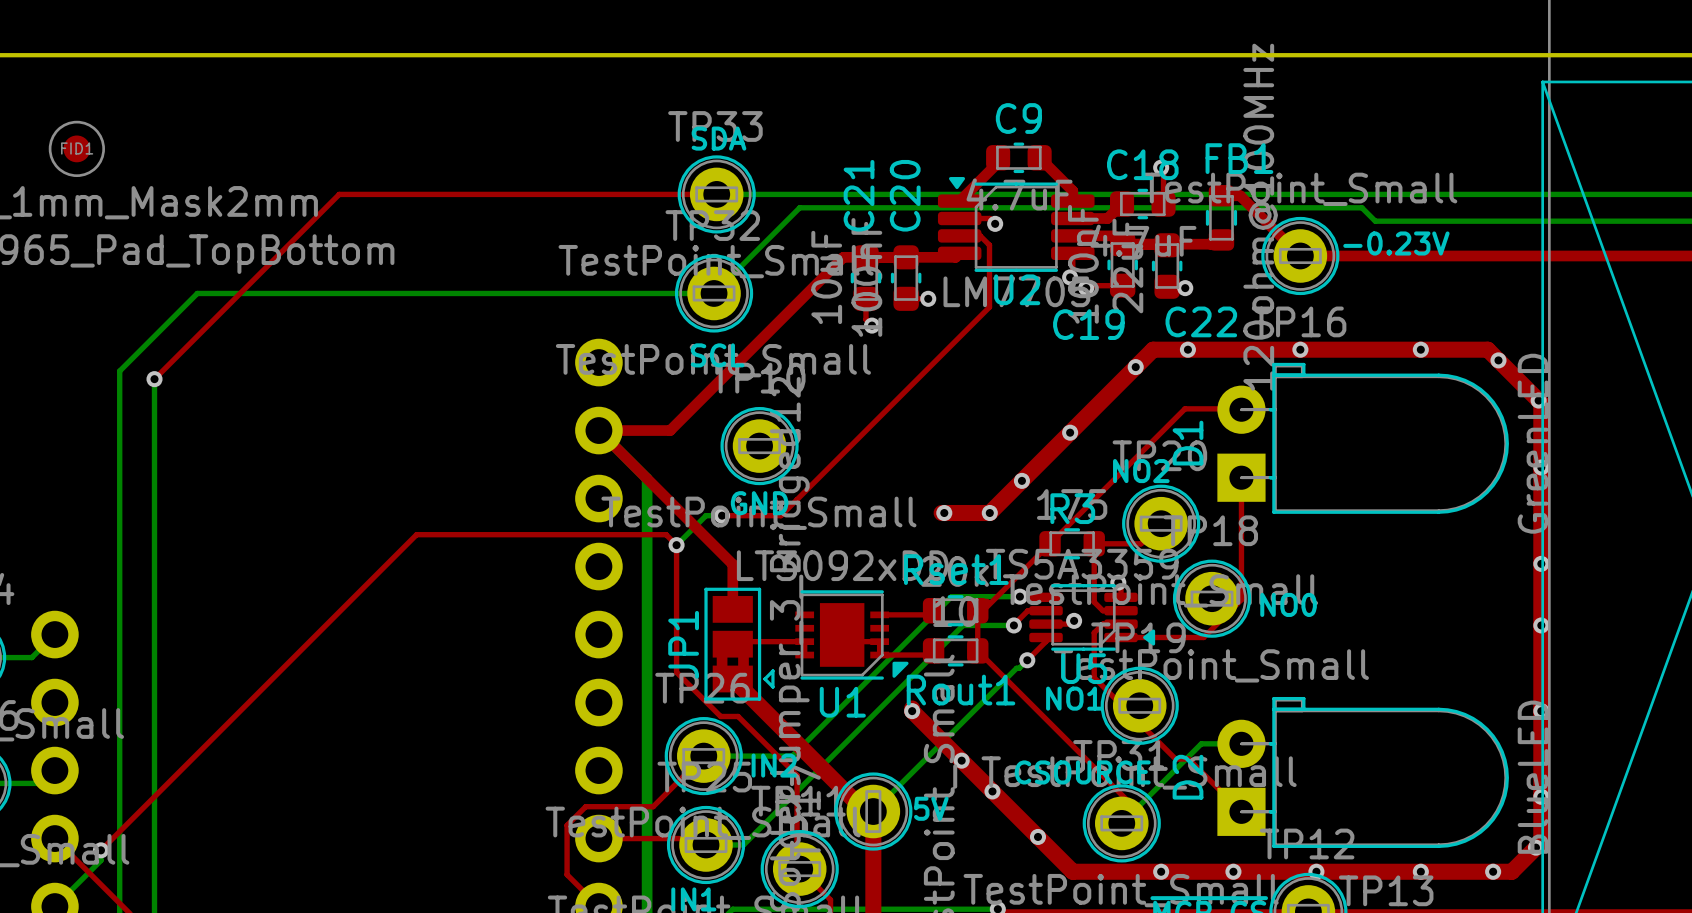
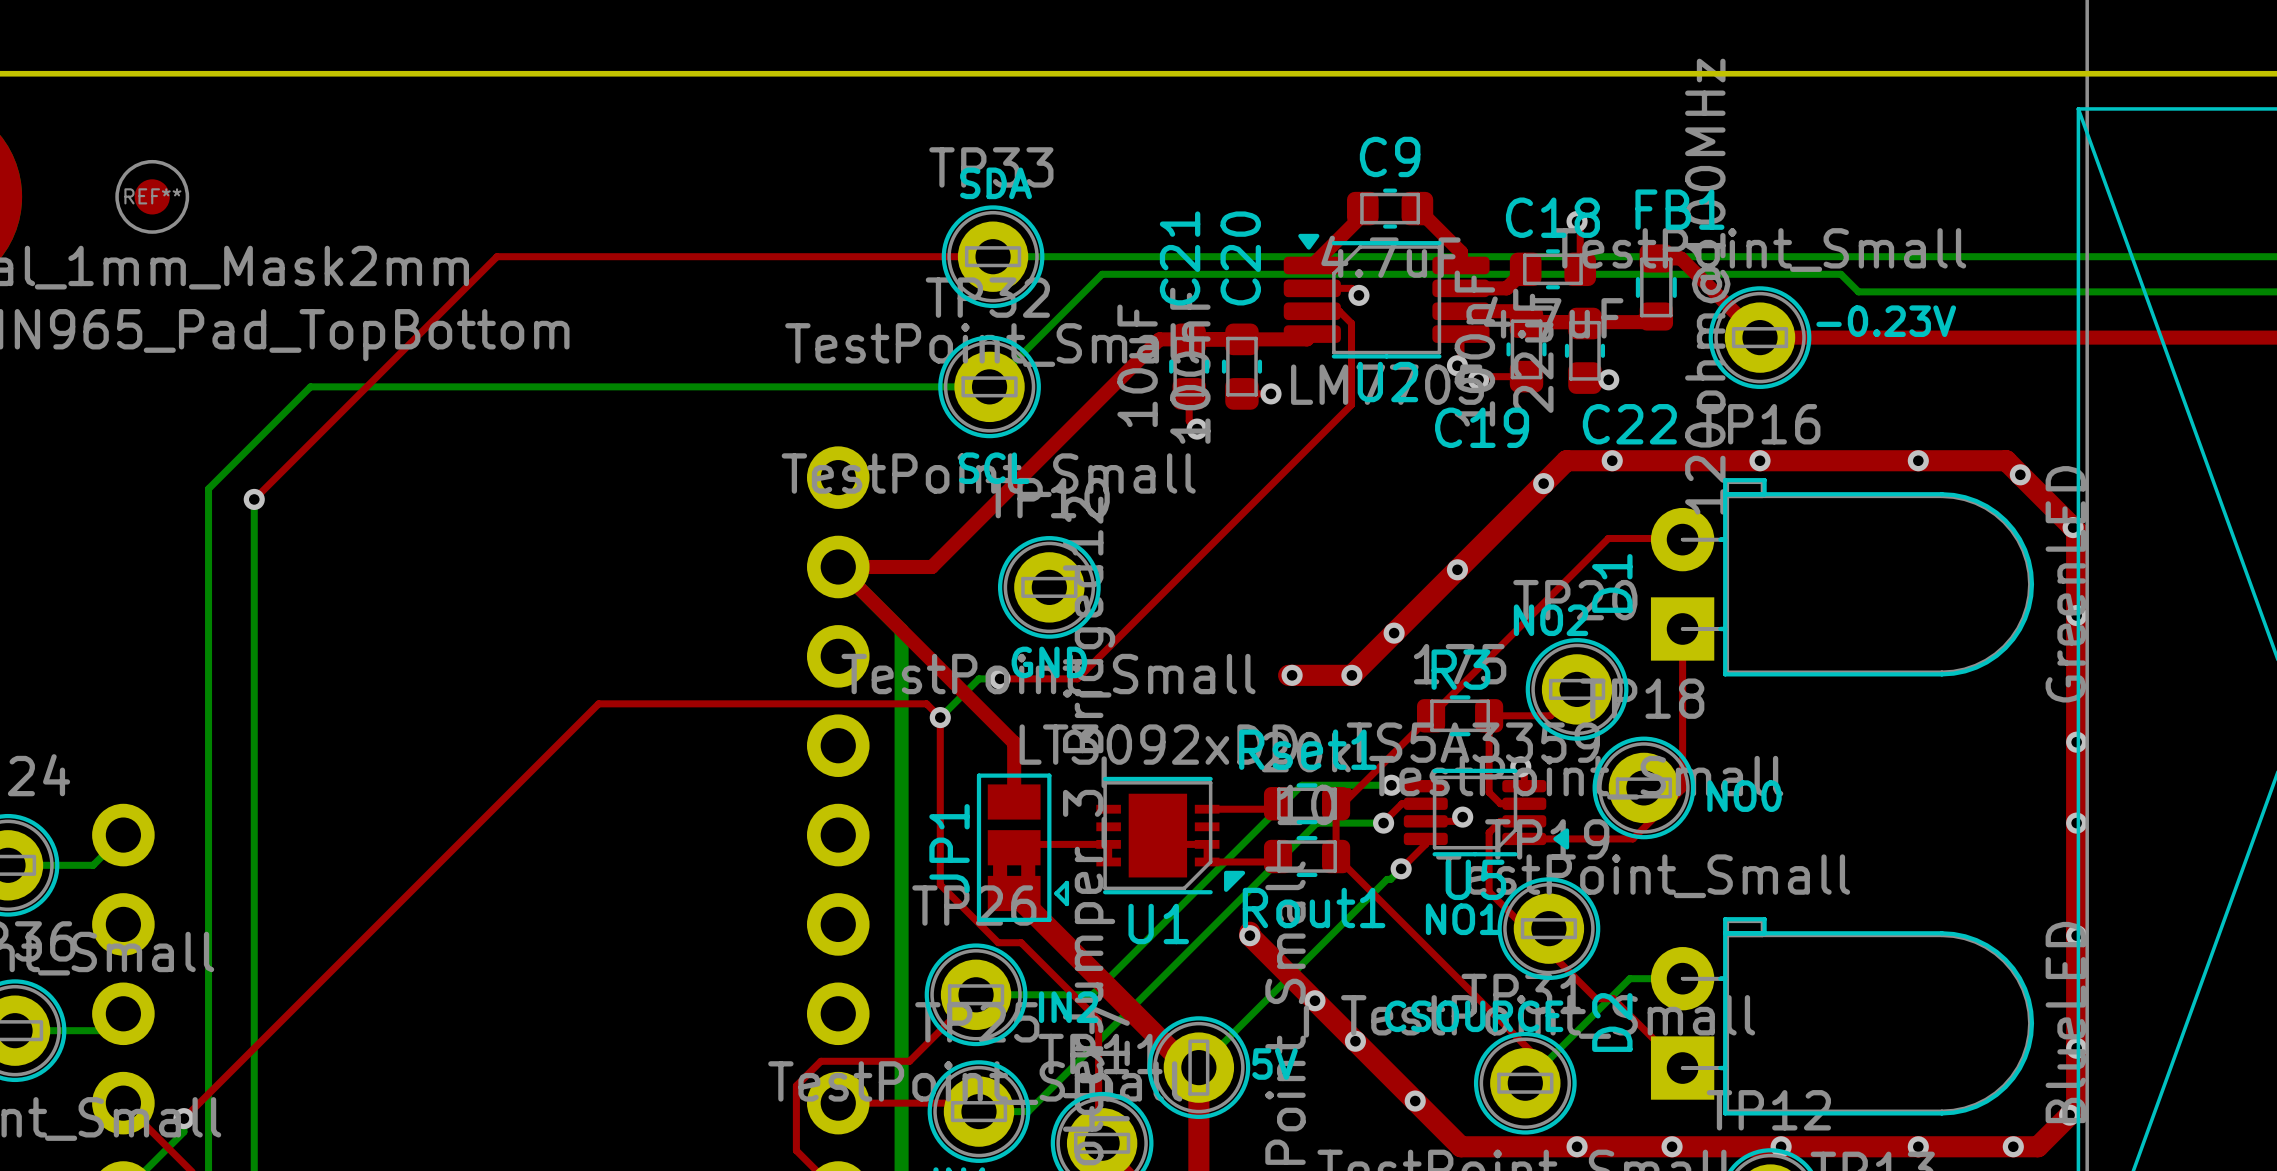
FID1 name: FID1 (77, 148) -> REF** (152, 196)

